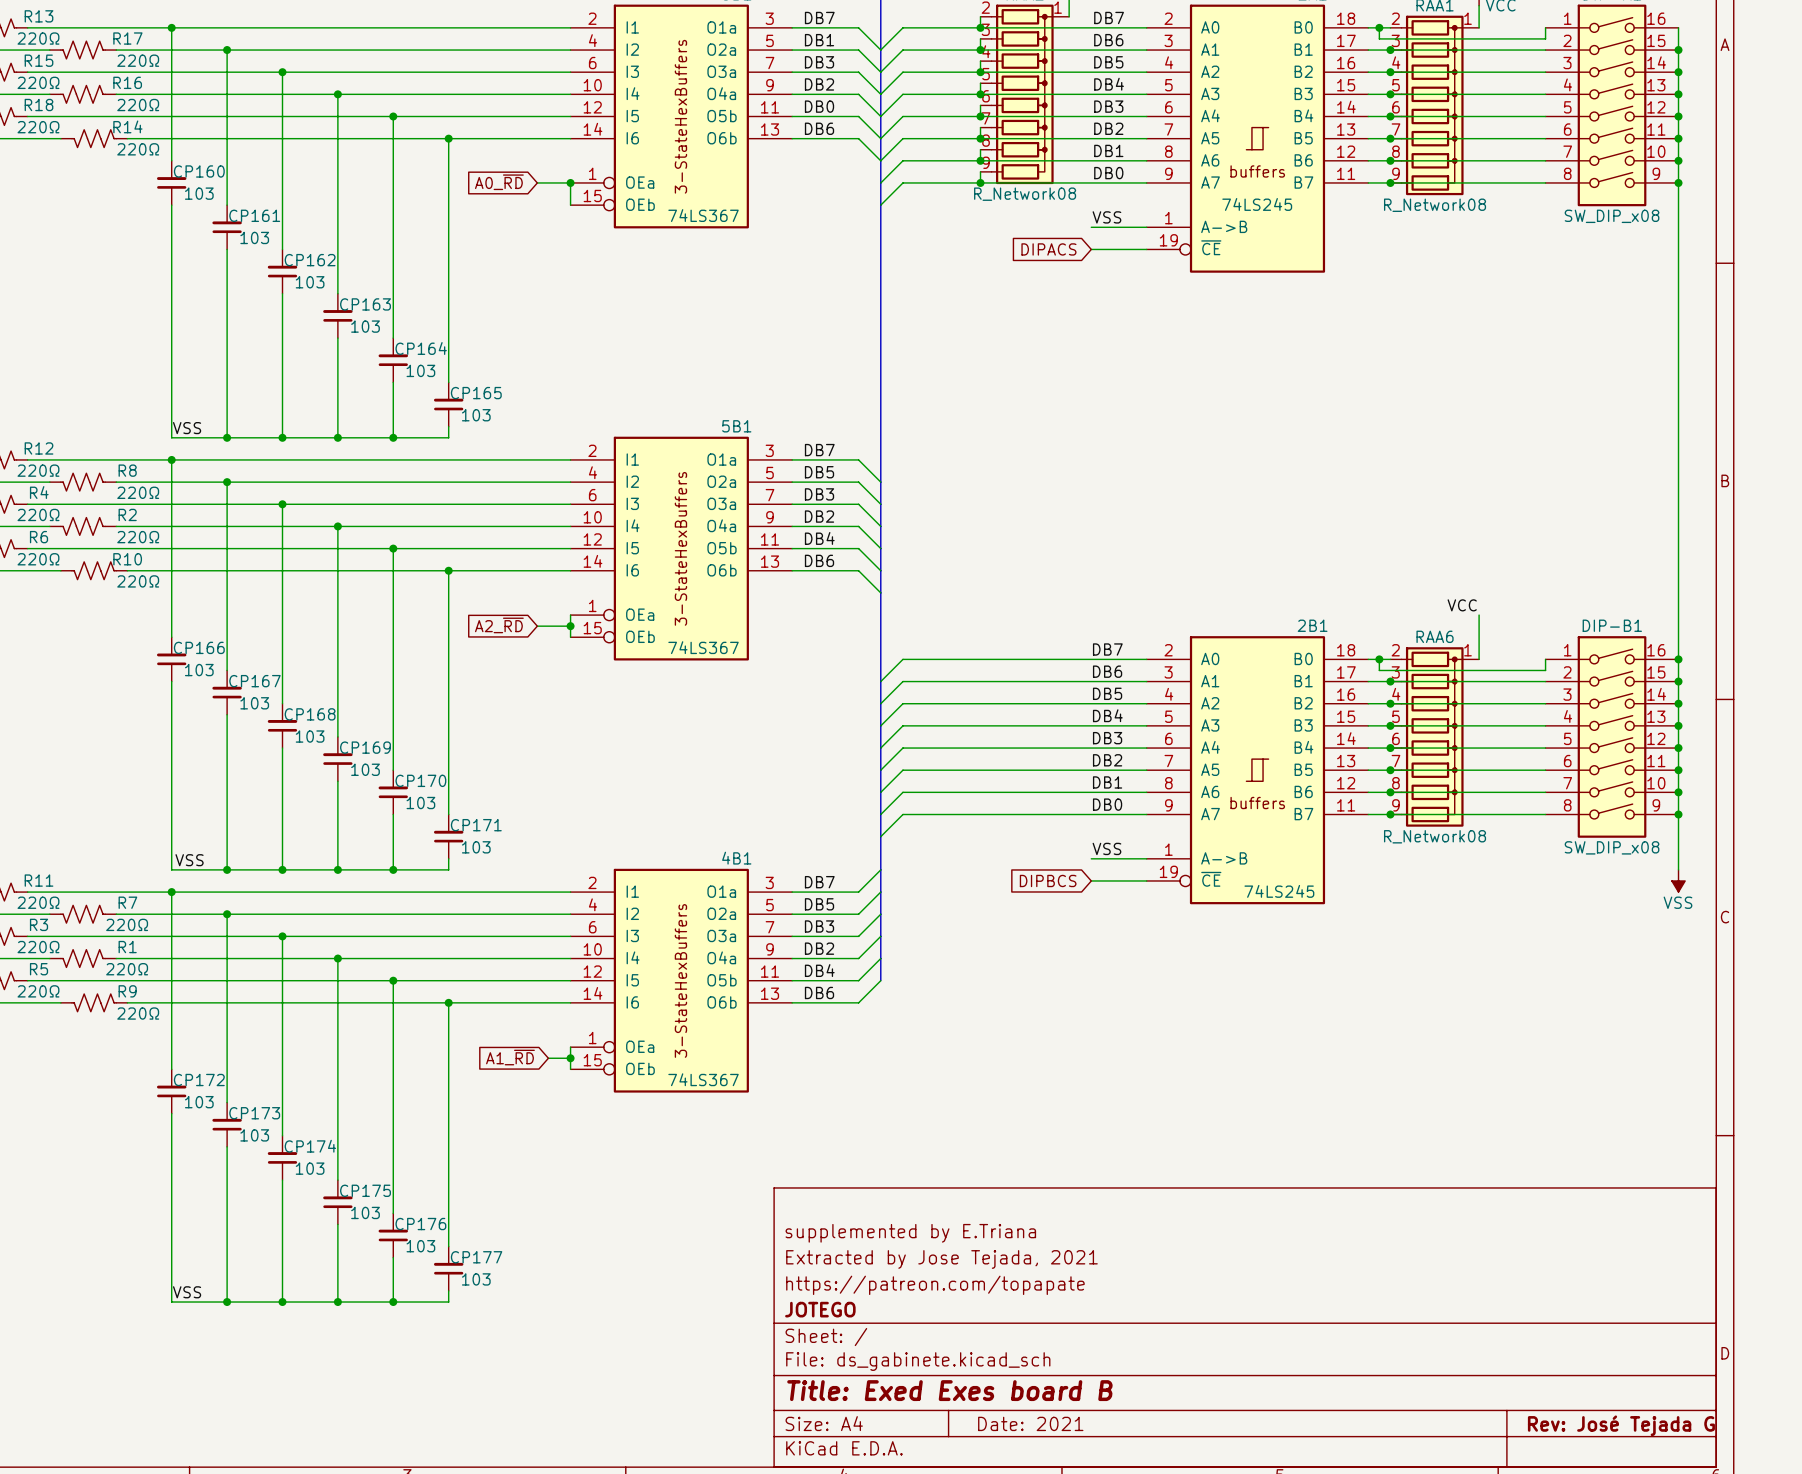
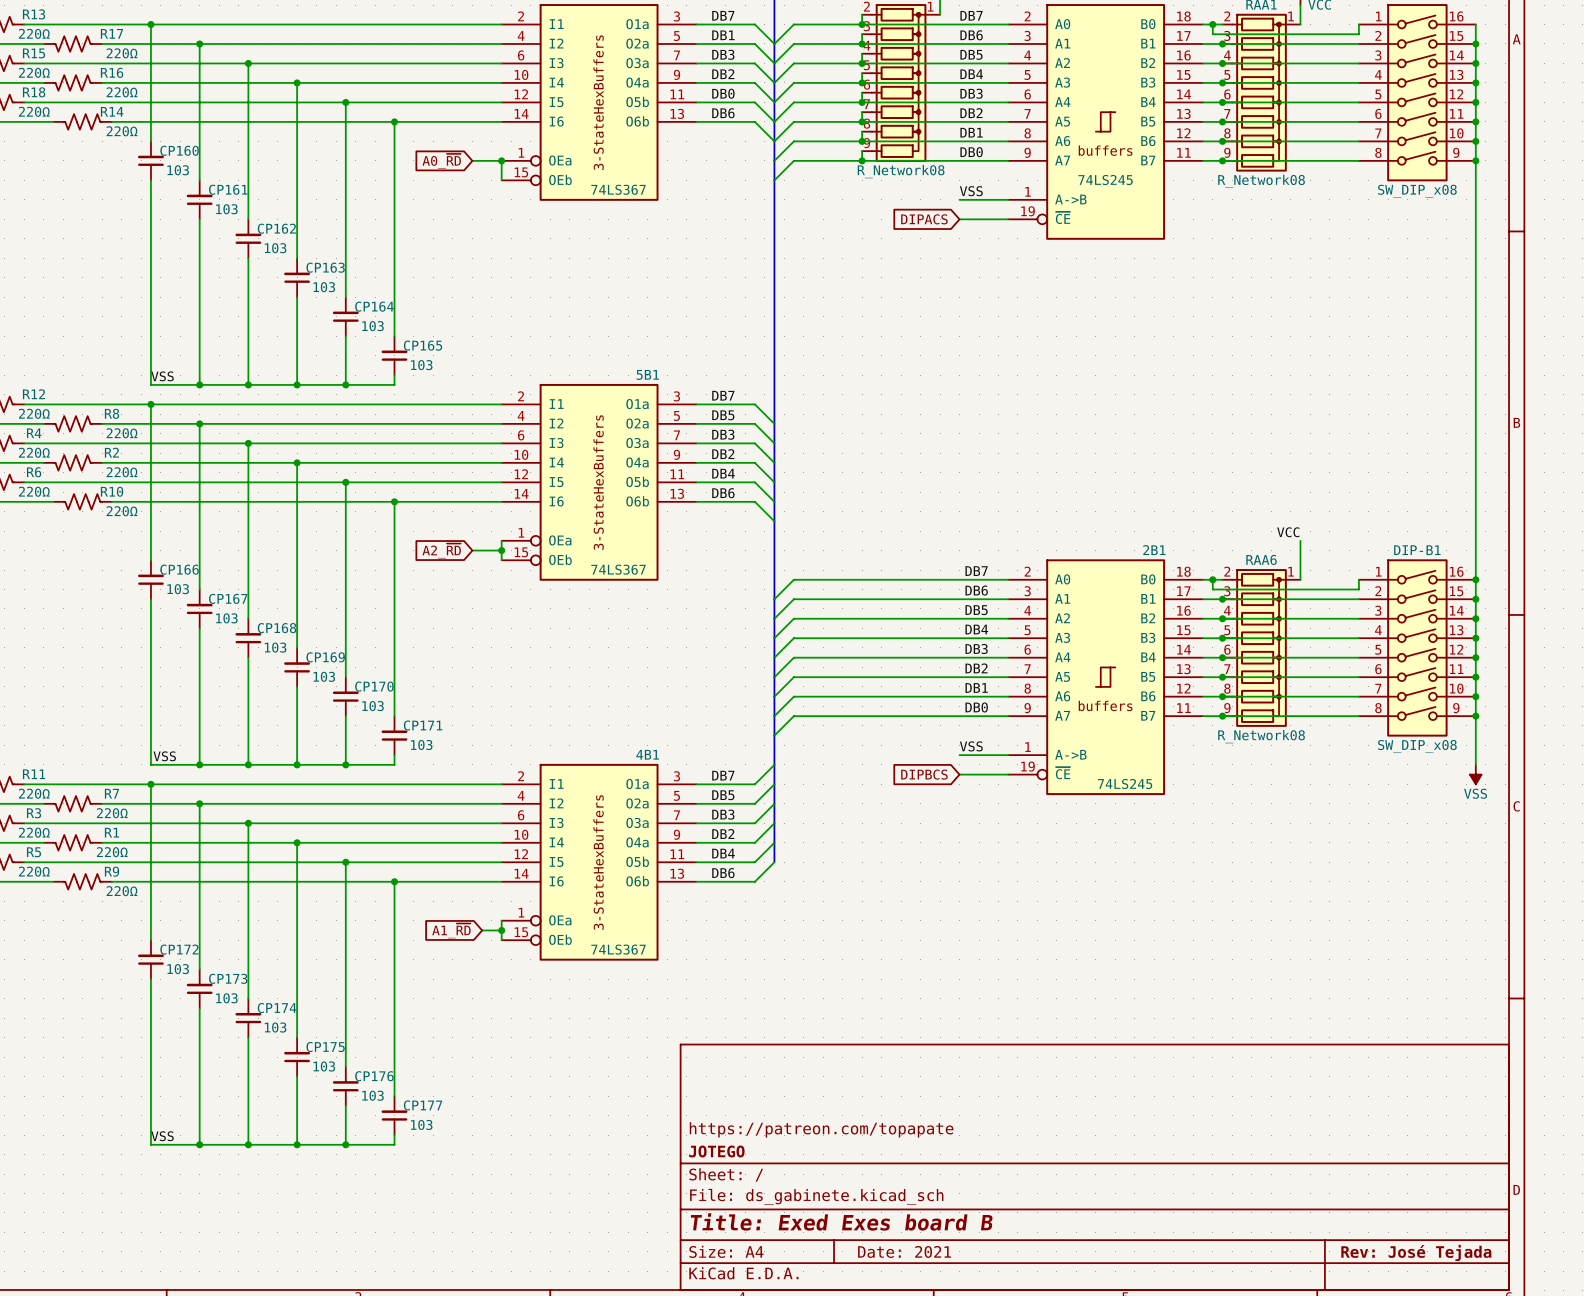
title block: supplemented by E.Triana (910, 1233) -> none
title block: Extracted by Jose Tejada, 2021 (941, 1259) -> none
title block: Rev: José Tejada G (1621, 1425) -> Rev: José Tejada (1416, 1252)

